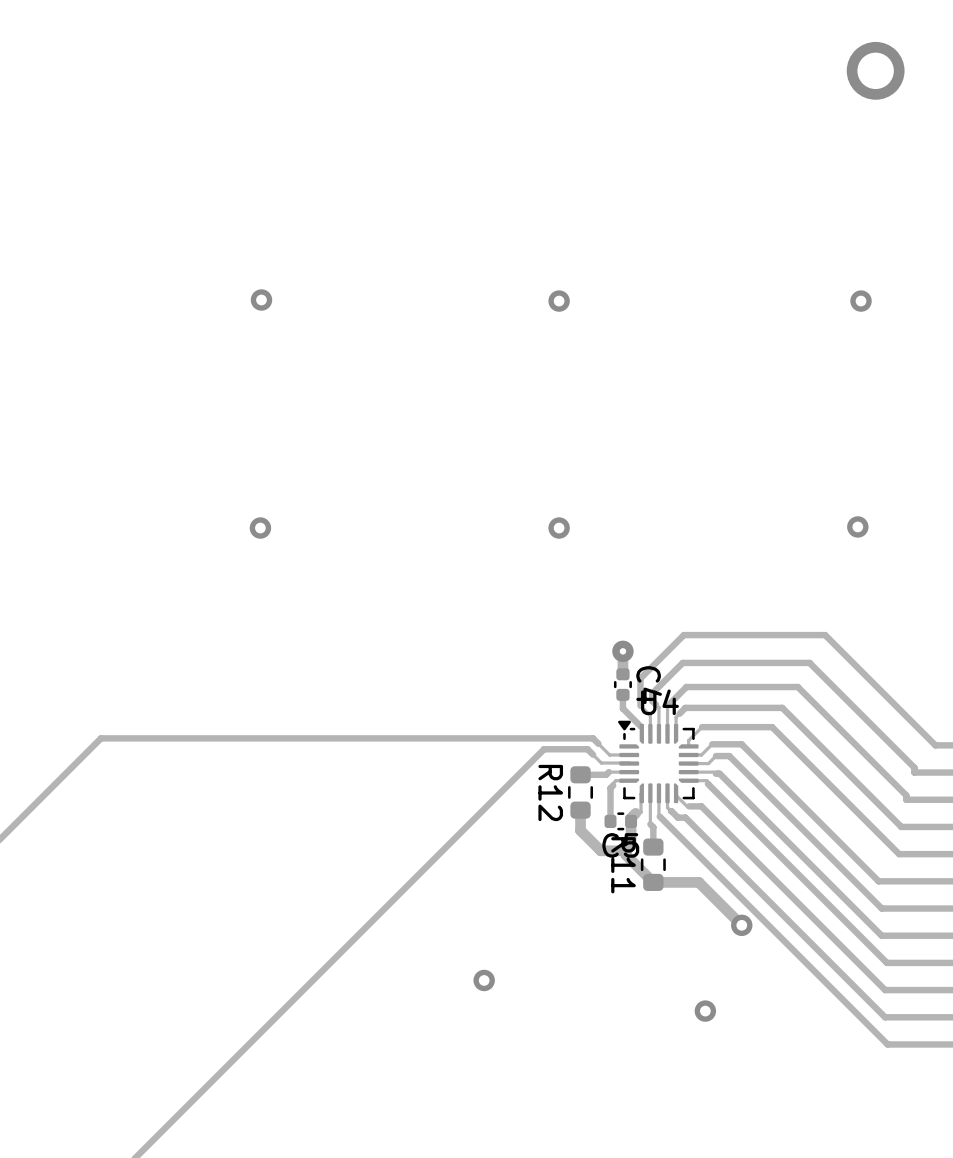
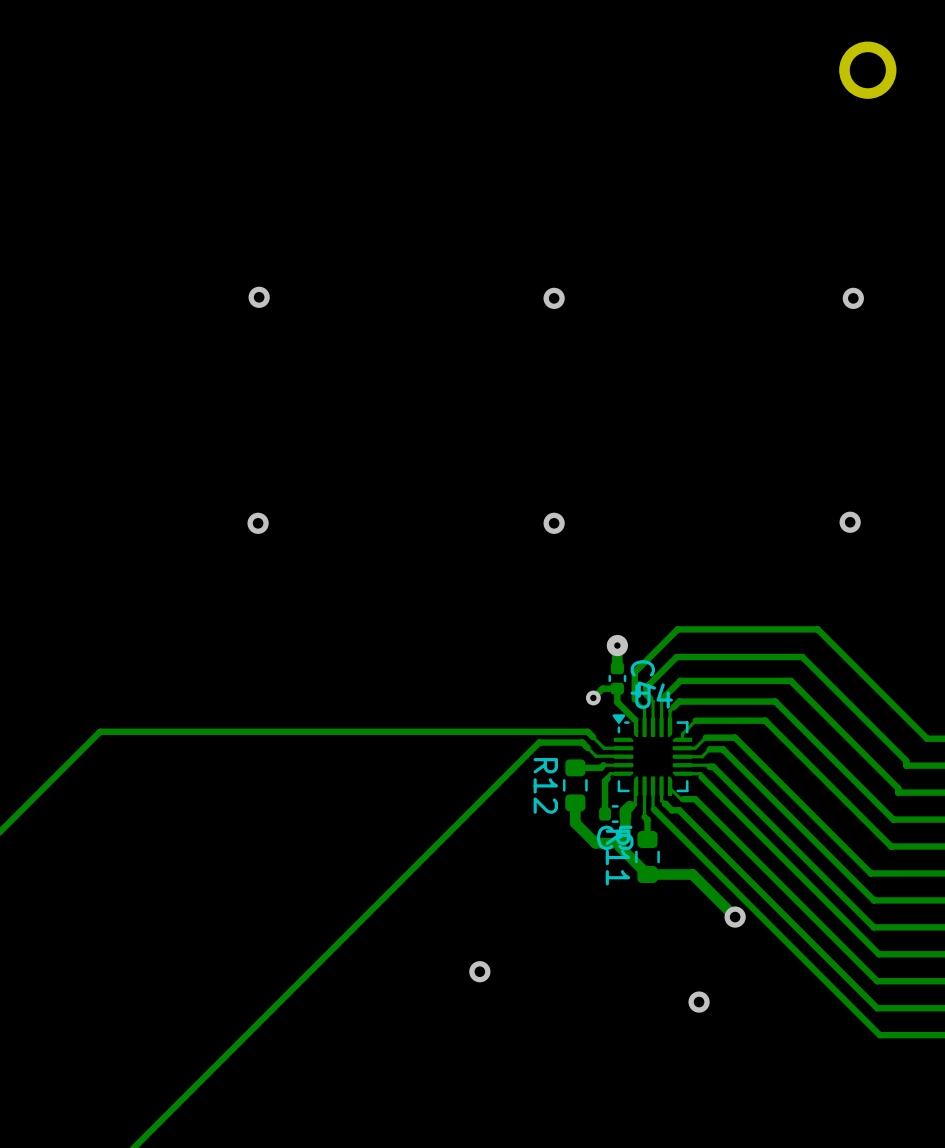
track: none -> (617, 688) (602, 688) (593, 697)
via: none -> (593, 697)

